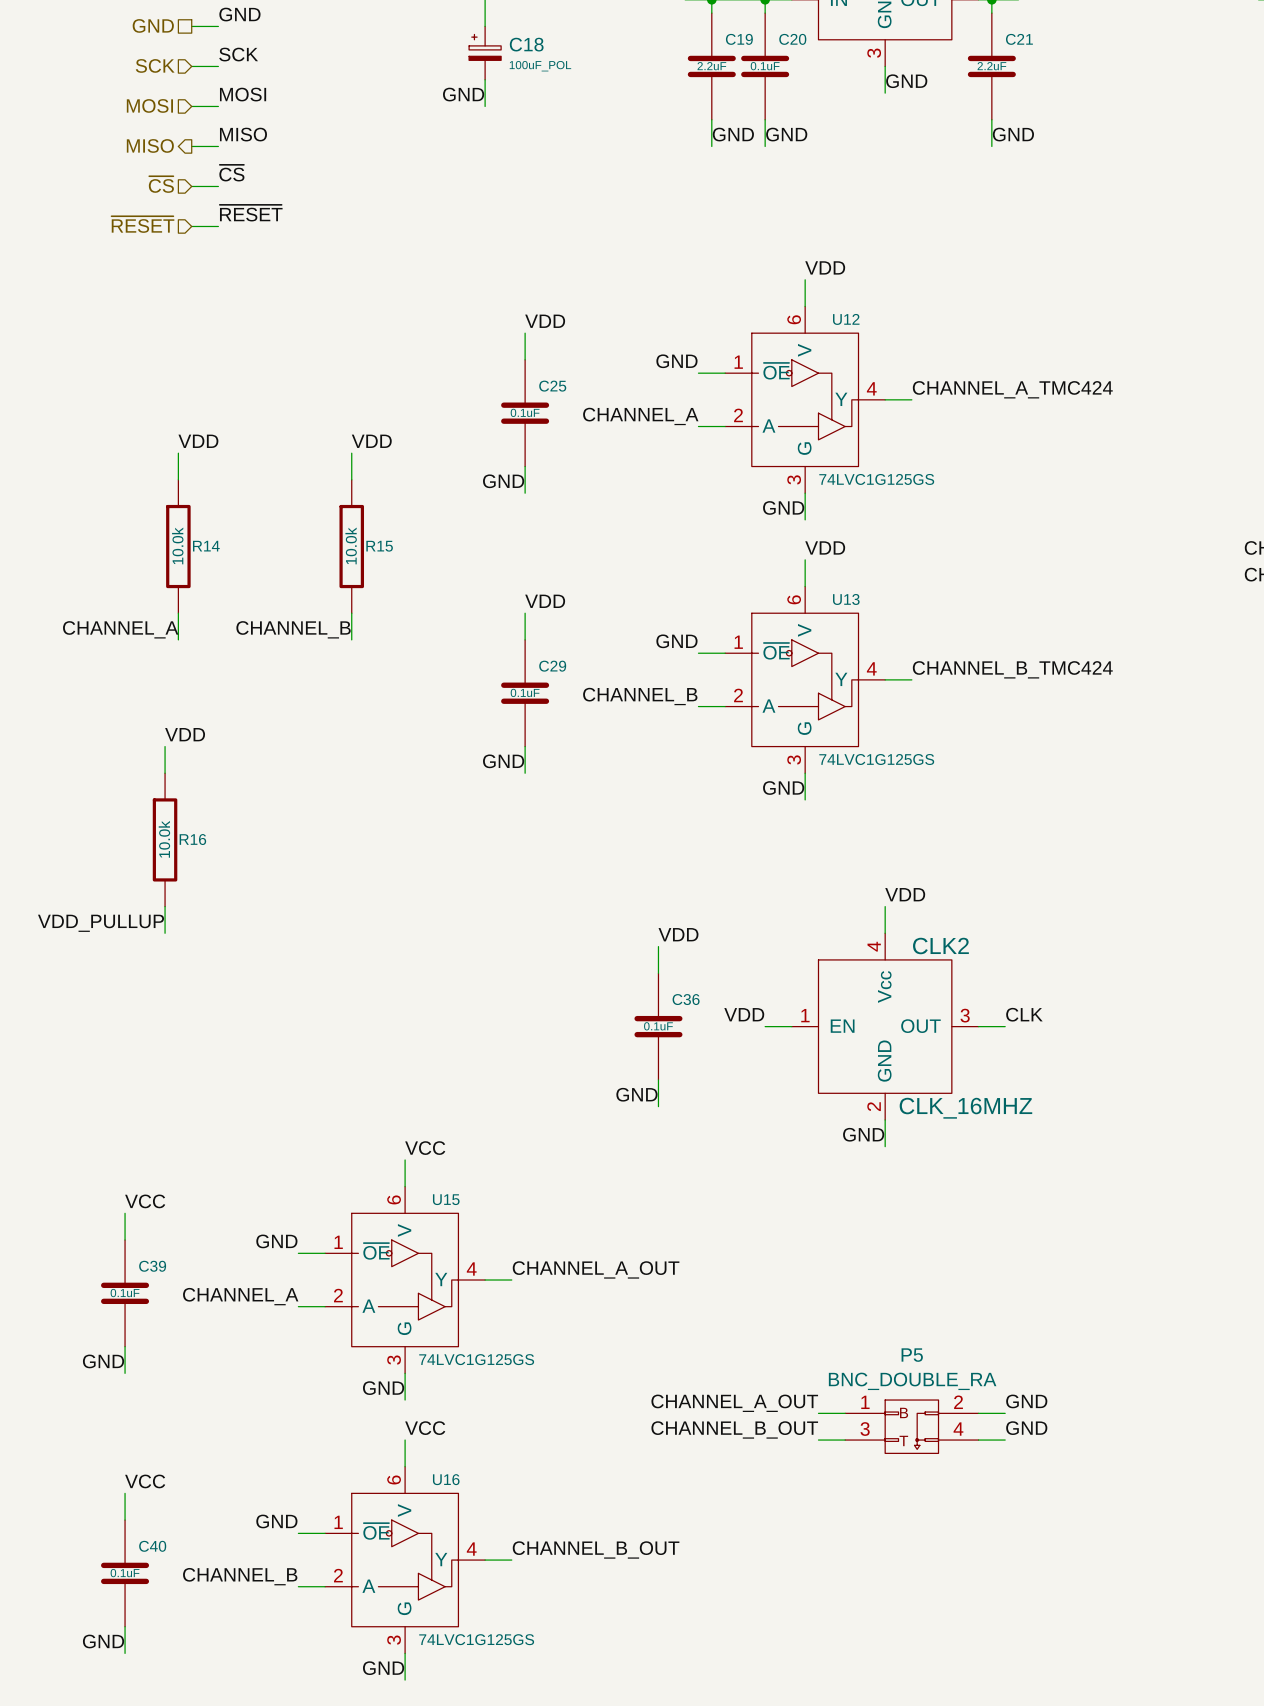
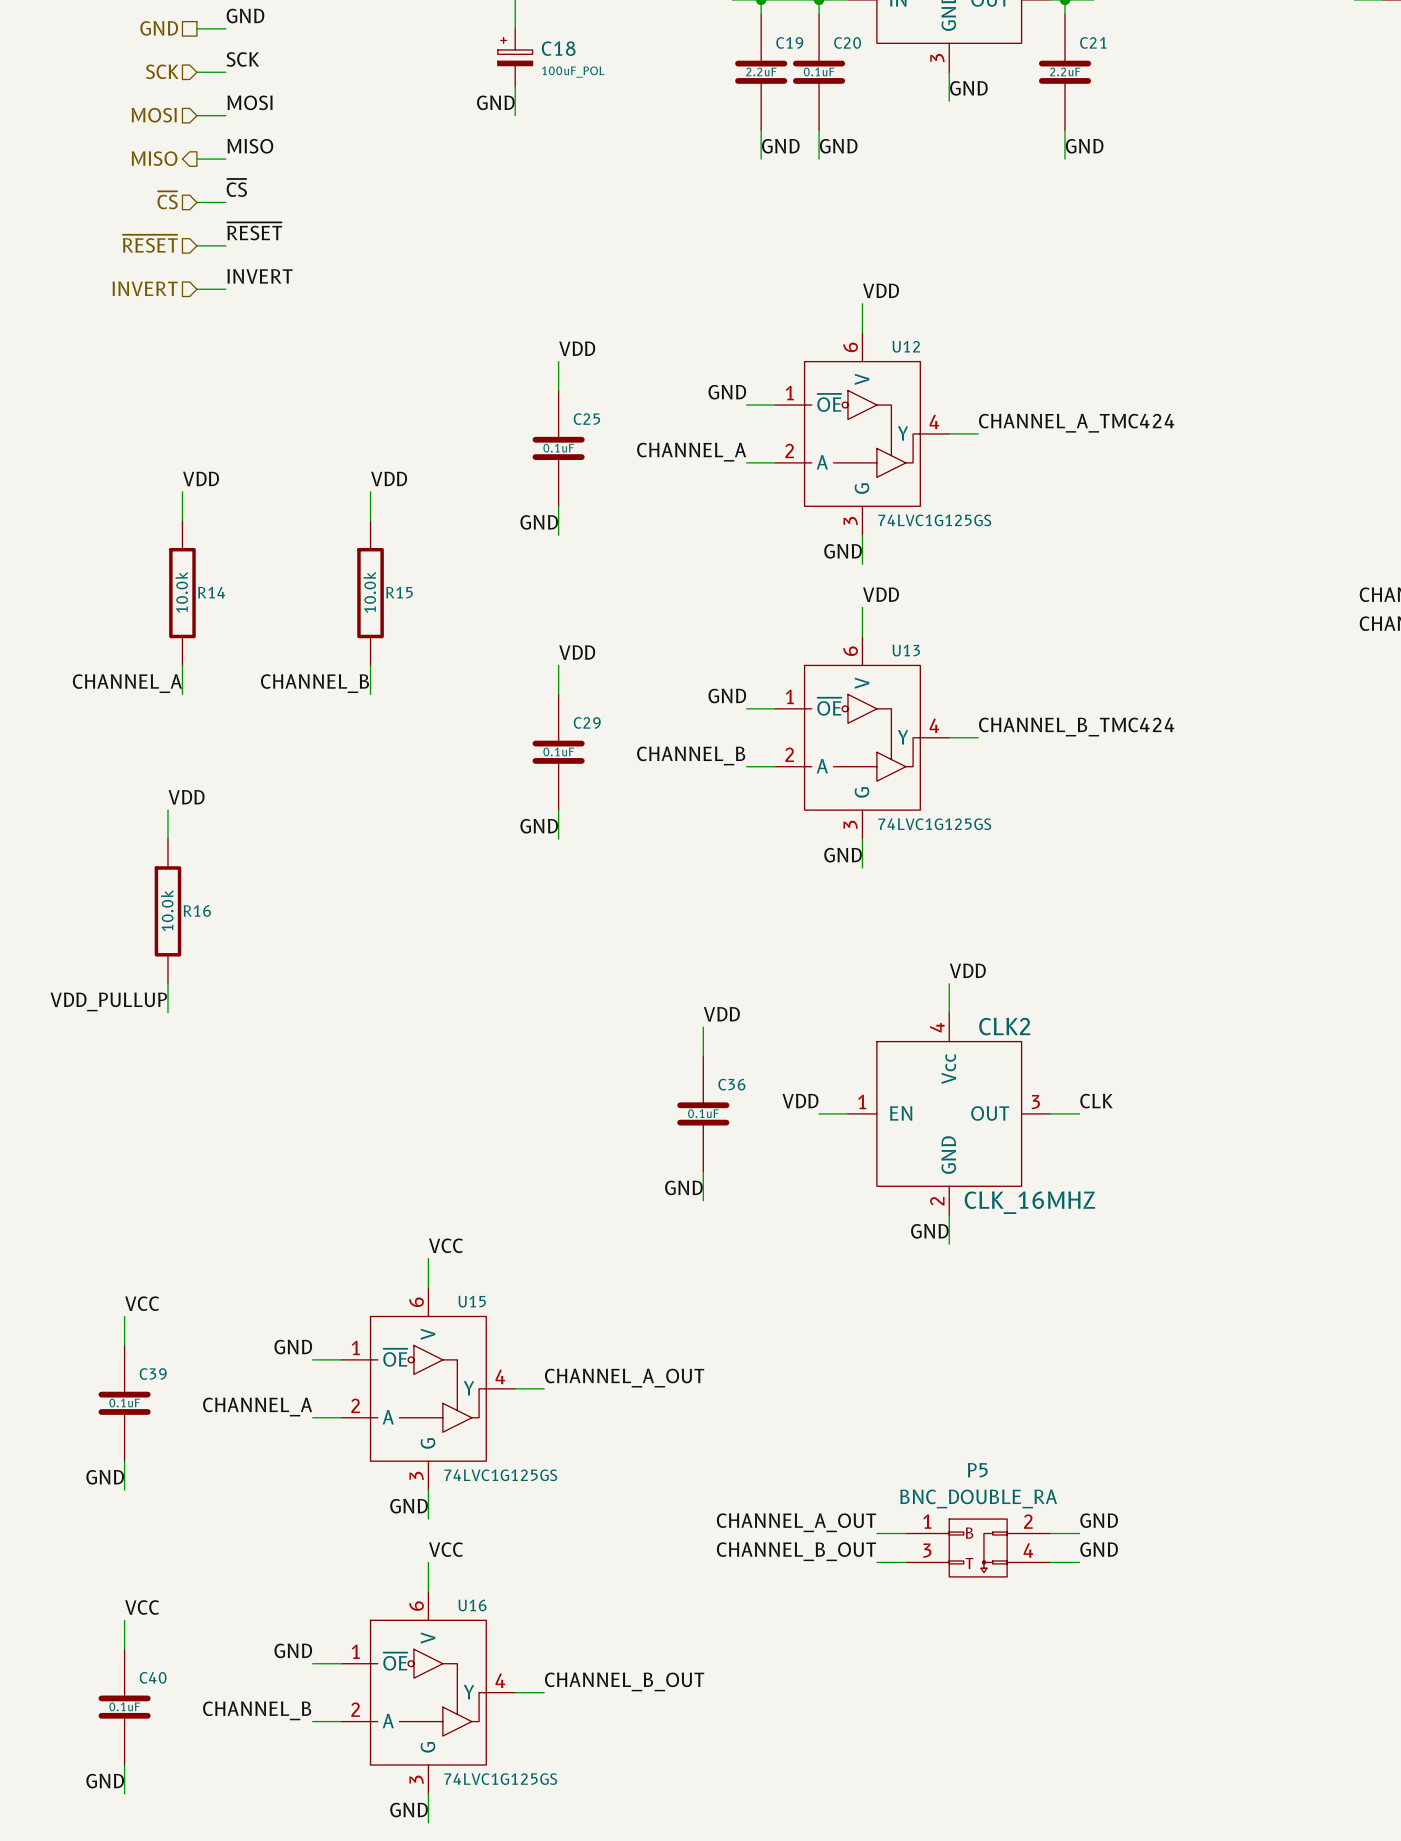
label: none -> INVERT (260, 276)
hierarchical label: none -> INVERT (145, 288)
wire: none -> (196, 289) (225, 289)

